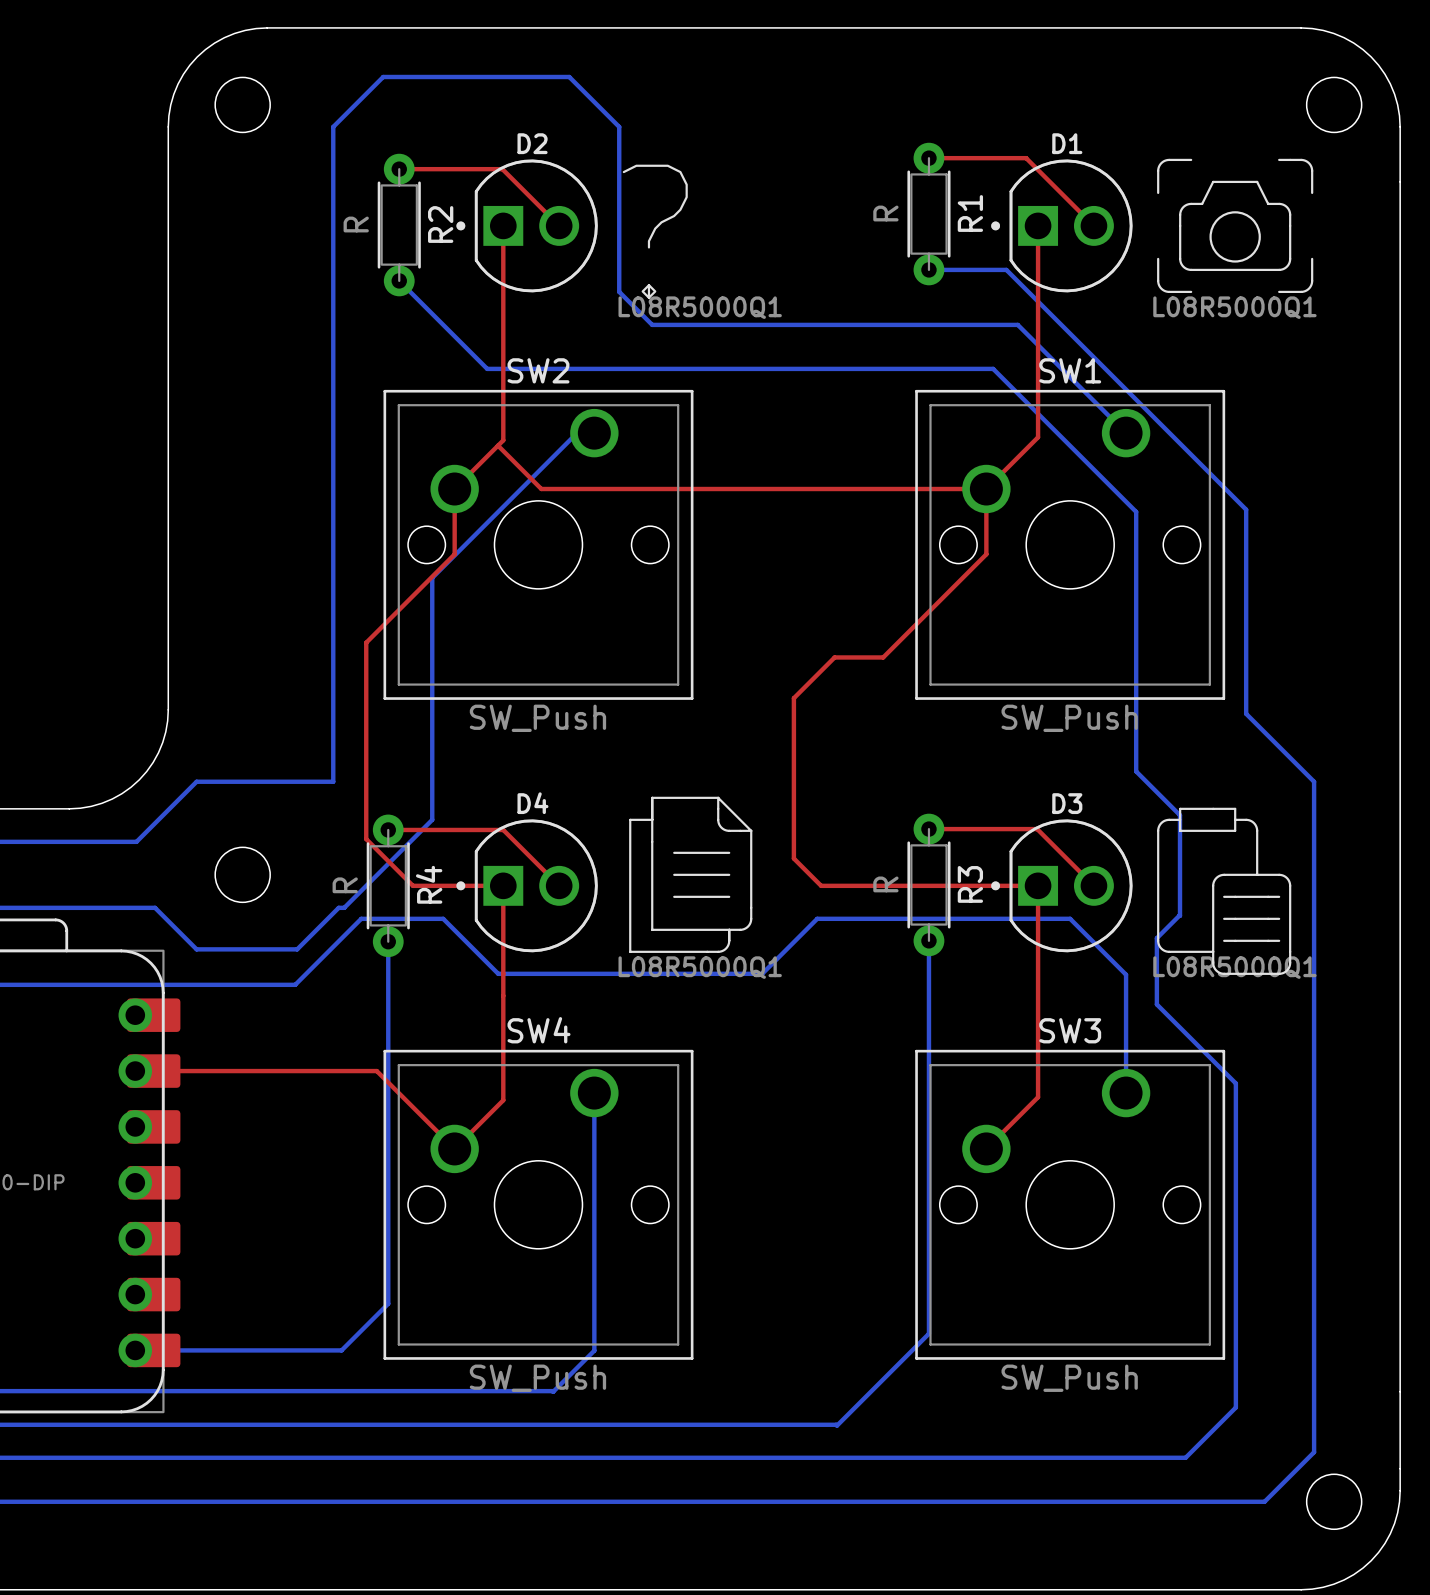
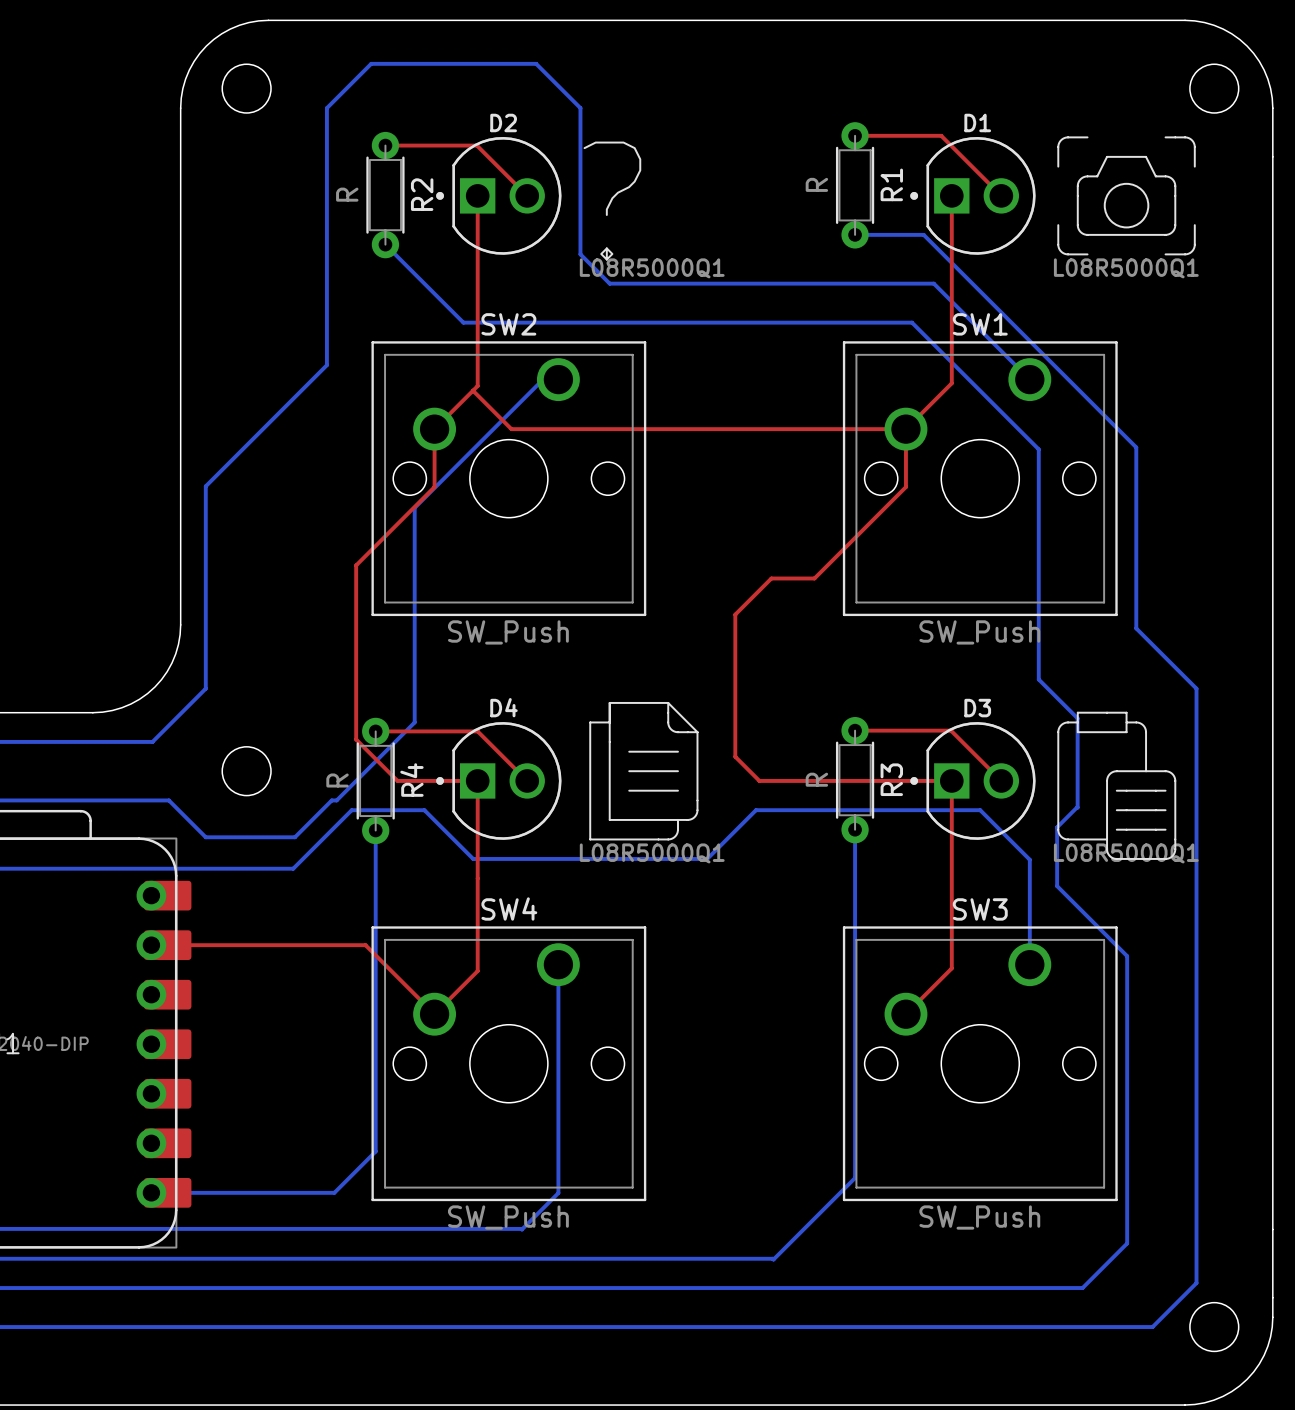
bottom track: (333, 416) (333, 781) (196, 781) -> (326, 365) (205, 486) (205, 688)

